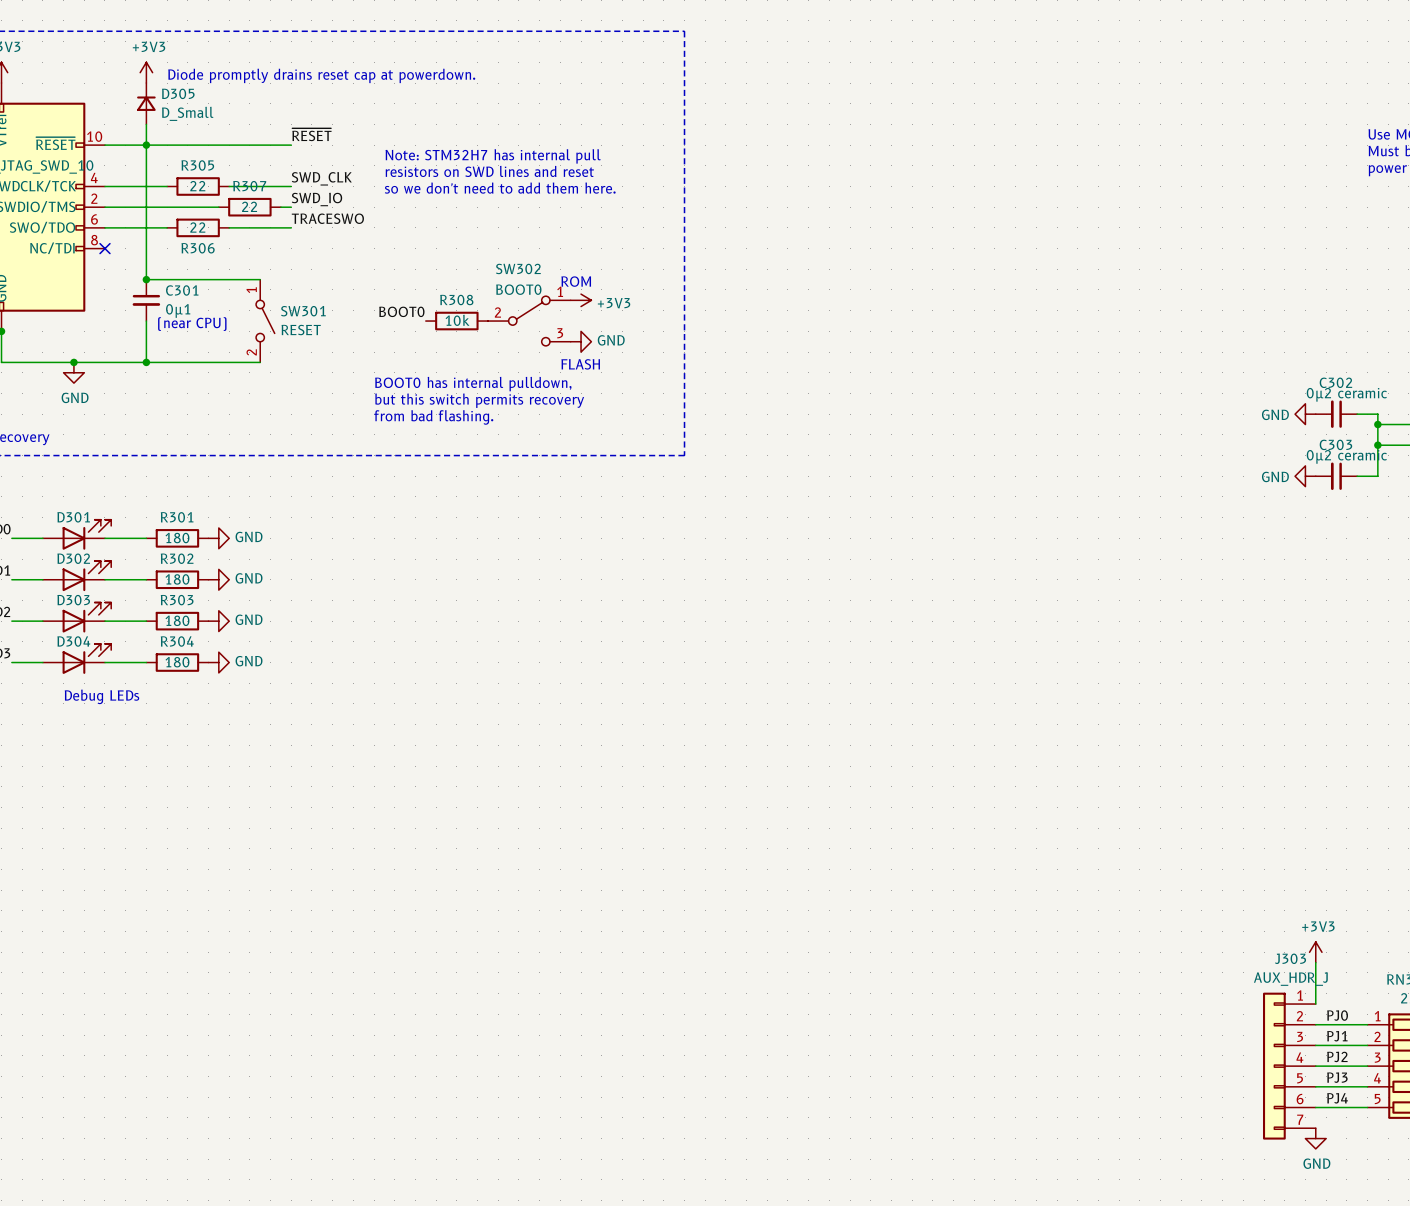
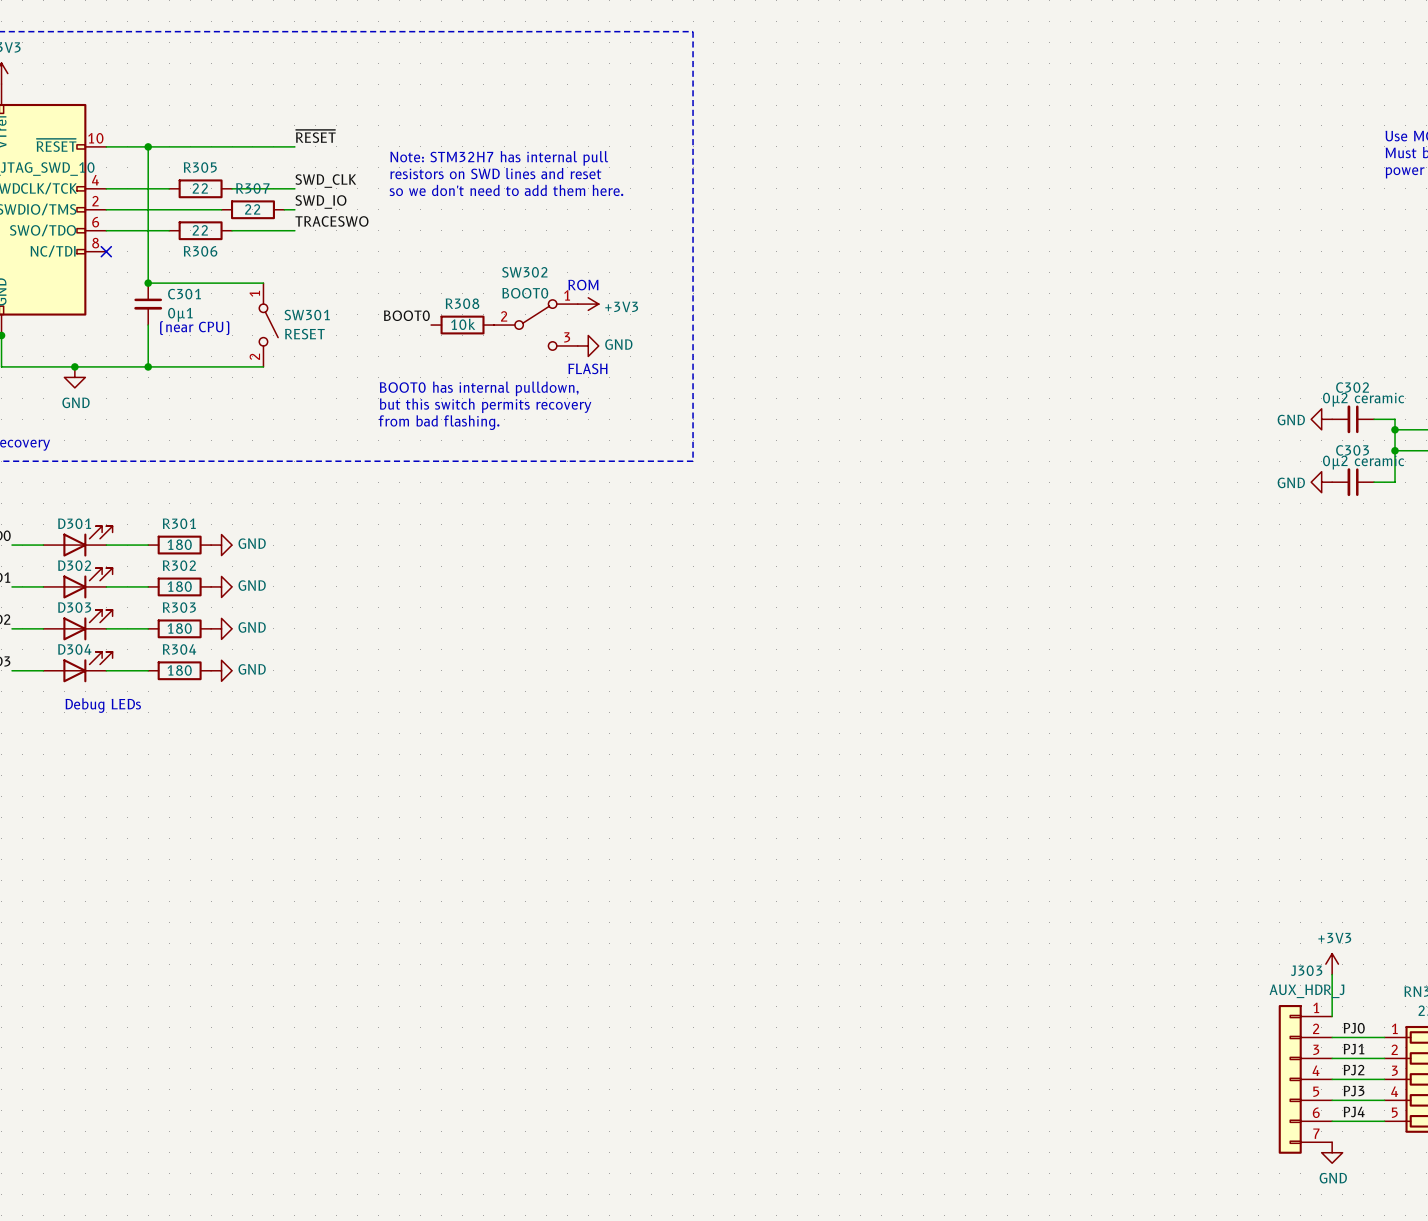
power symbol: +3V3 (146, 72) -> none
text: Diode promptly drains reset cap at powerdown. (321, 75) -> none
D305: D_Small (146, 103) -> none
wire: (146, 124) (146, 145) -> none

